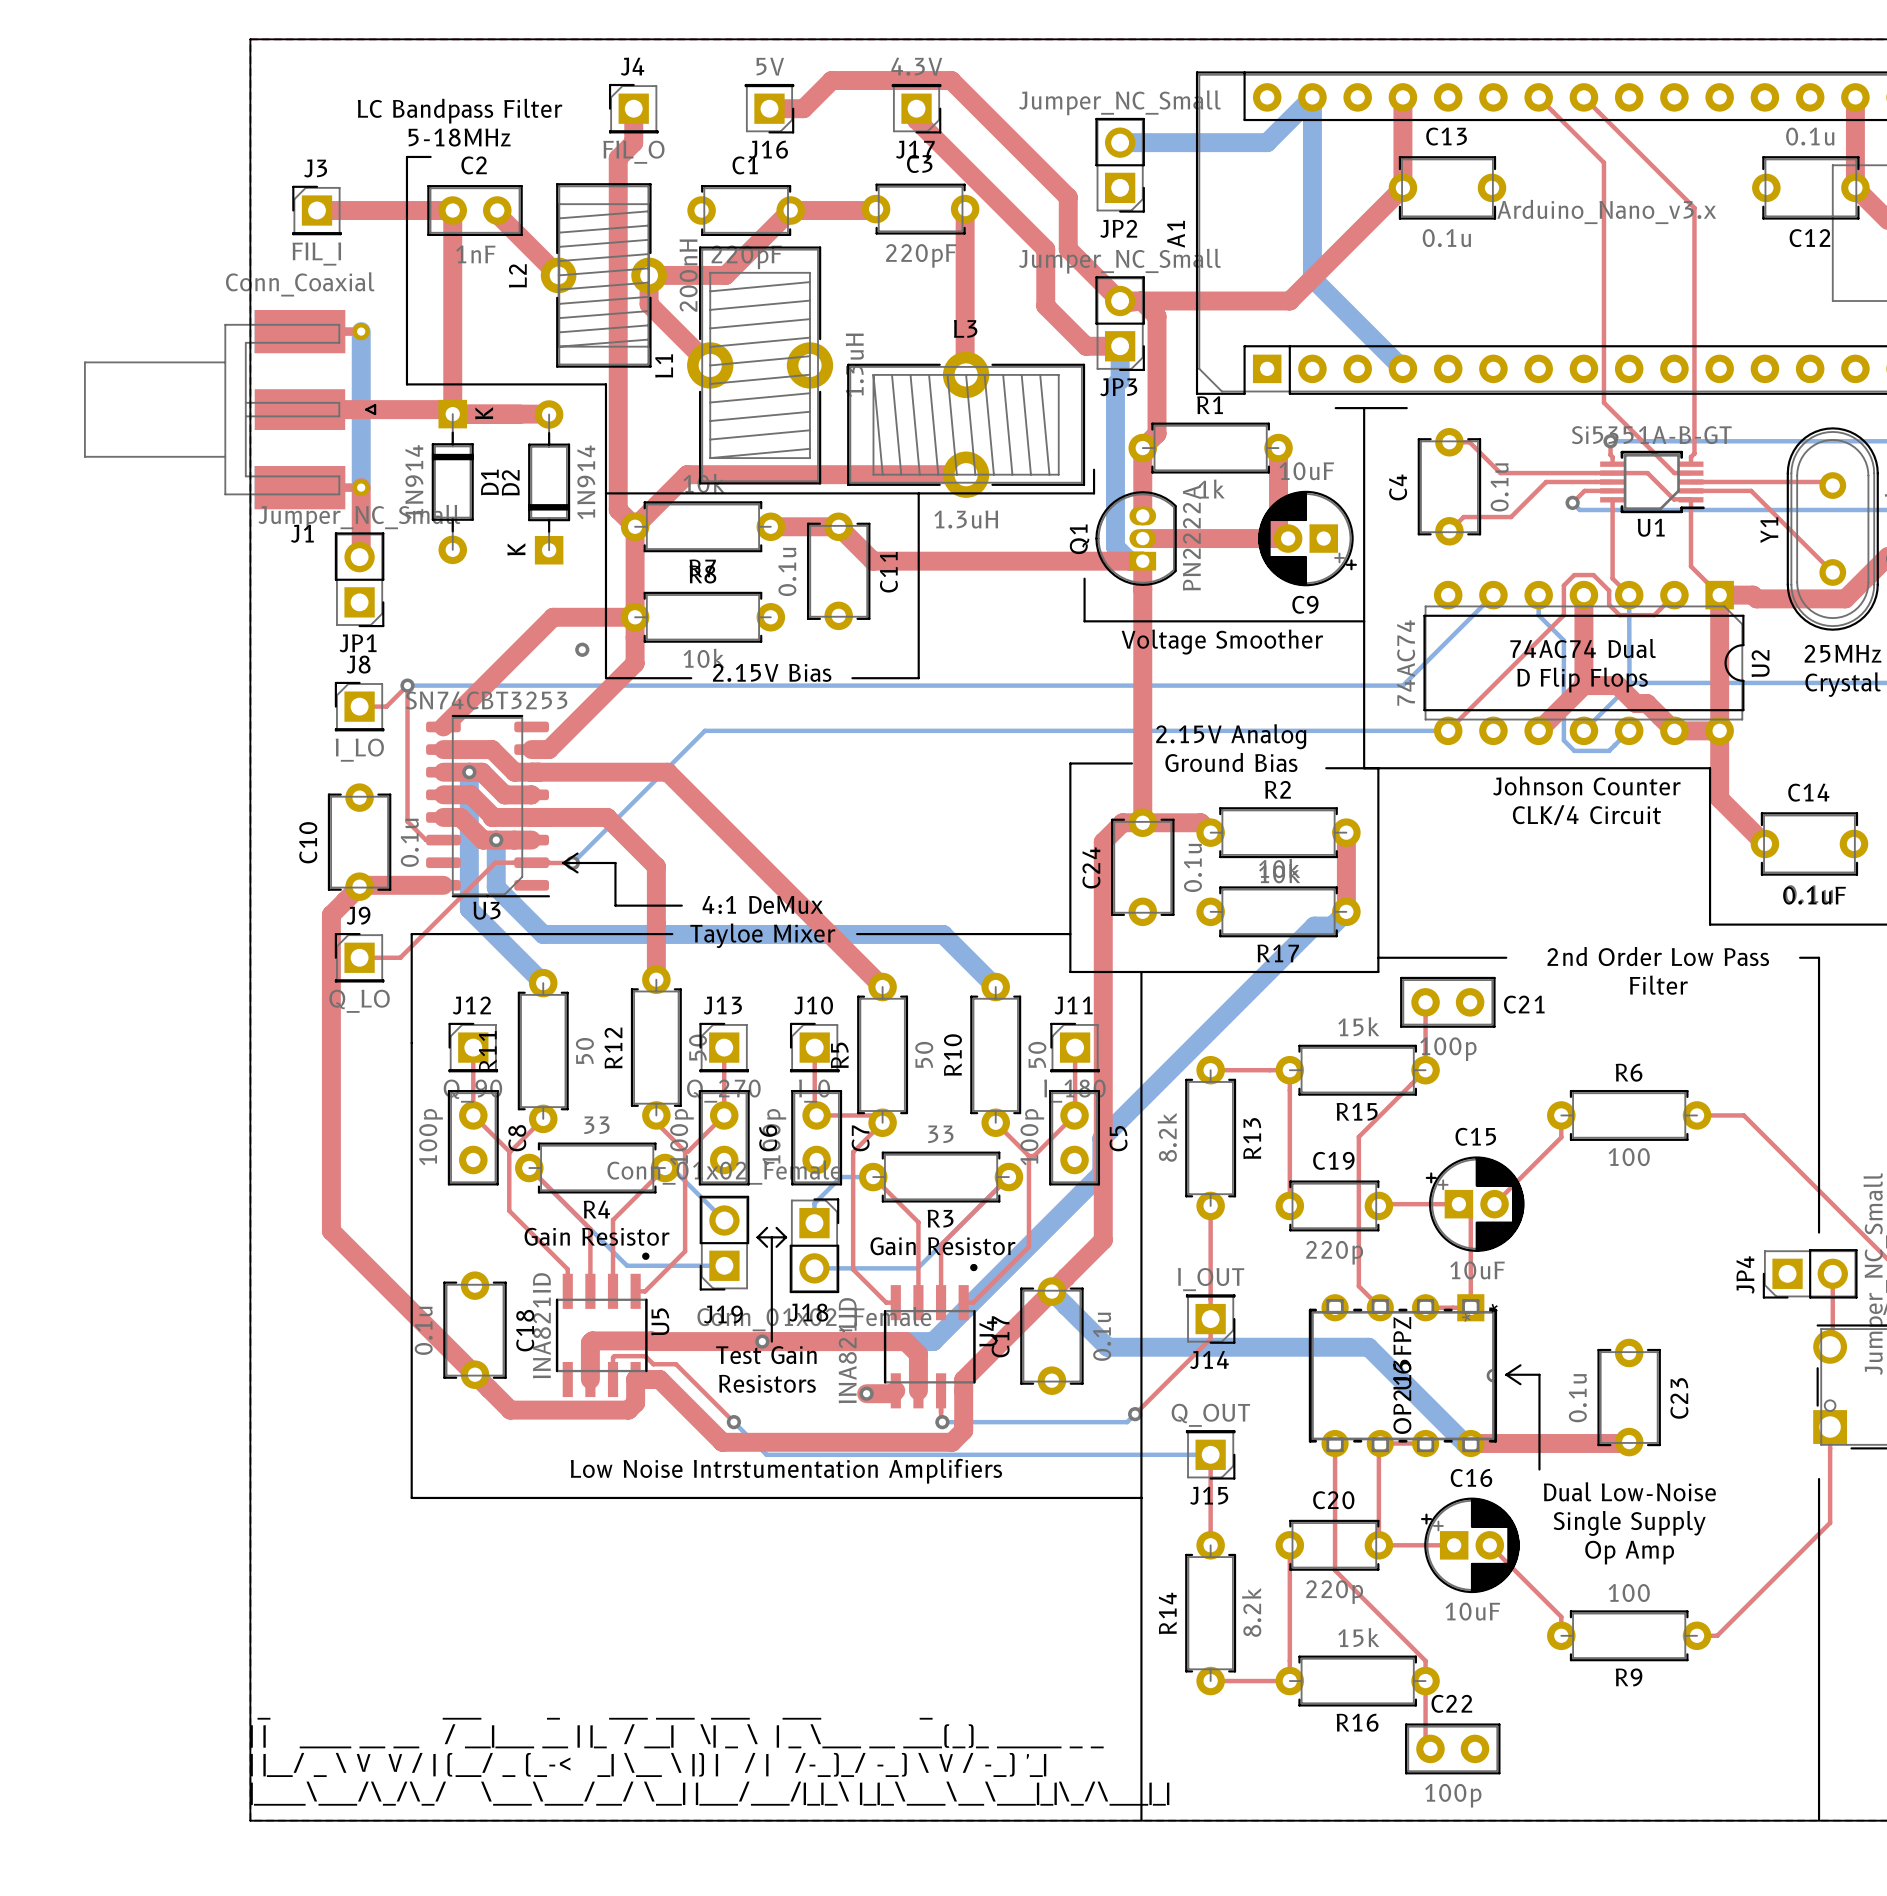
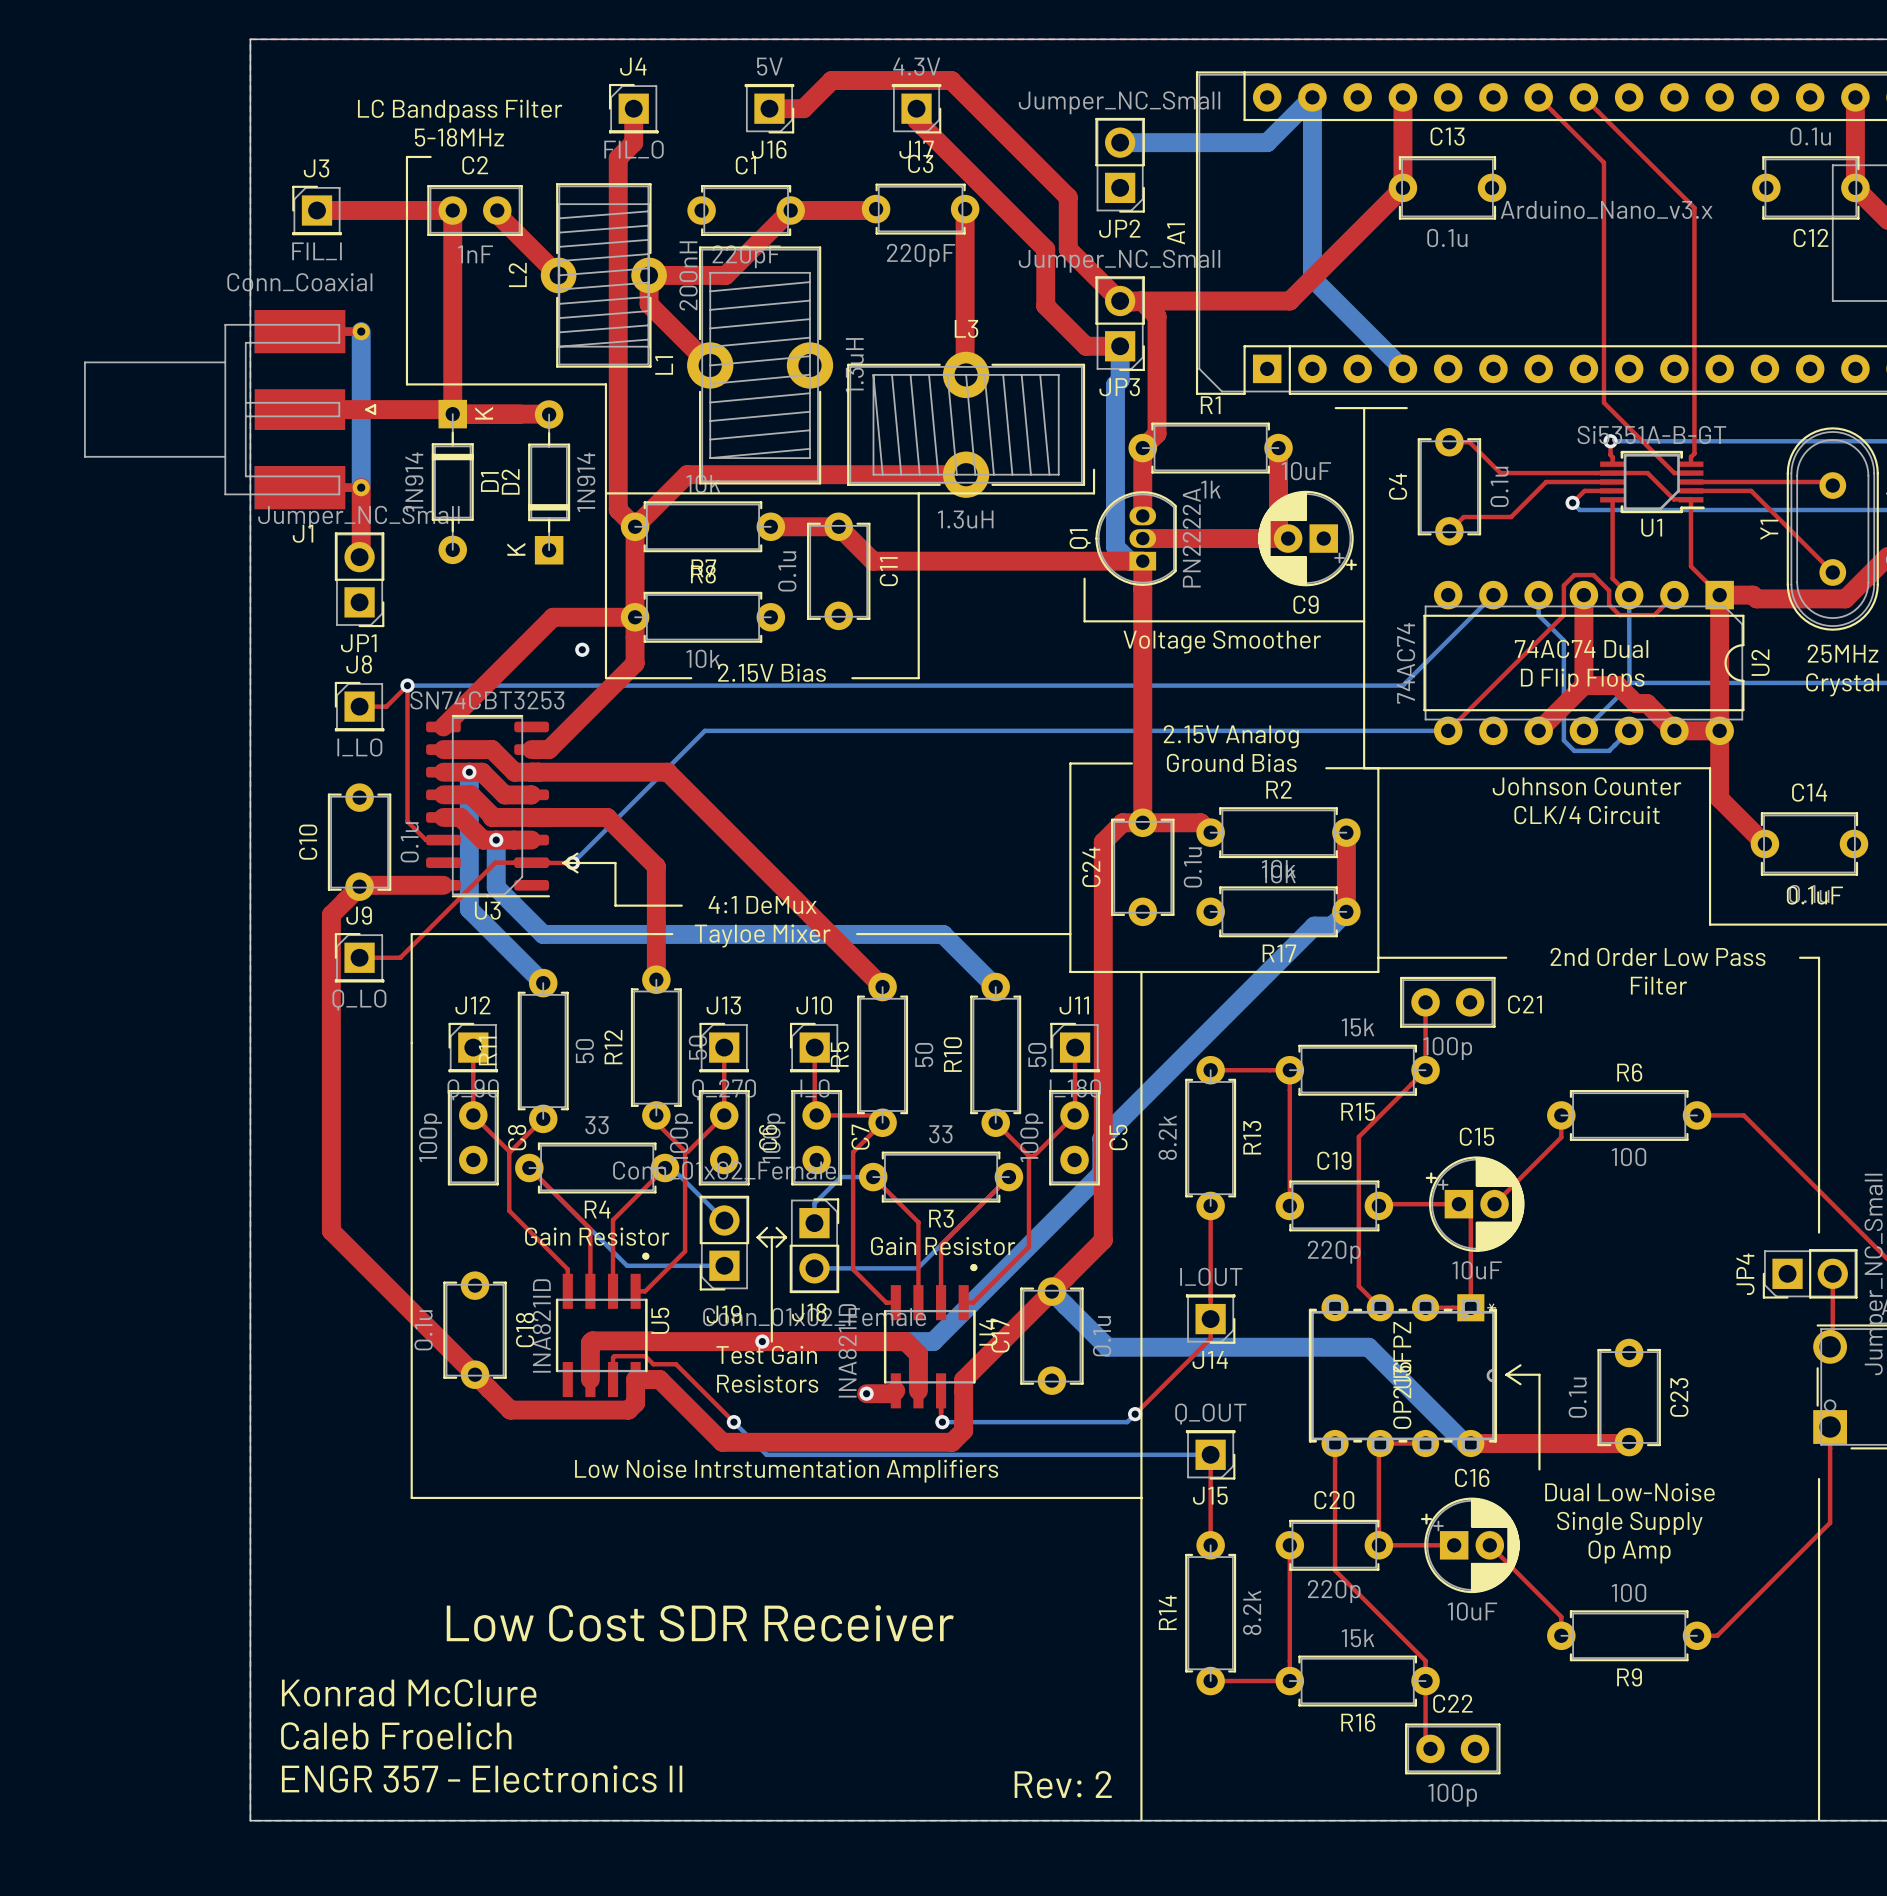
text: none -> Low Cost SDR Receiver (700, 1623)
text: none -> Konrad McClure (409, 1692)
text: _ ___ _ ___ ___ ___ ___ _ (595, 1718) -> none
text: none -> Caleb Froelich (396, 1735)
text: | | ____ __ __ / __|___ __ | |_ / __| \| _ \ | _ \___ __ ___(_)_ _____ _ _ (677, 1736) -> none
text: | |__/ _ \ V V / | (__/ _ (_-< _| \__ \ |) | / | /-_)_/ -_) \ V / -_) '_| (648, 1764) -> none
text: none -> ENGR 357 - Electronics II (482, 1778)
text: none -> Rev: 2 (1063, 1784)
text: |____\___/\_/\_/ \___\___/__/ \__| |___/___/|_|_\ |_|_\___\__\___|_|\_/\___|_| (709, 1793) -> none

